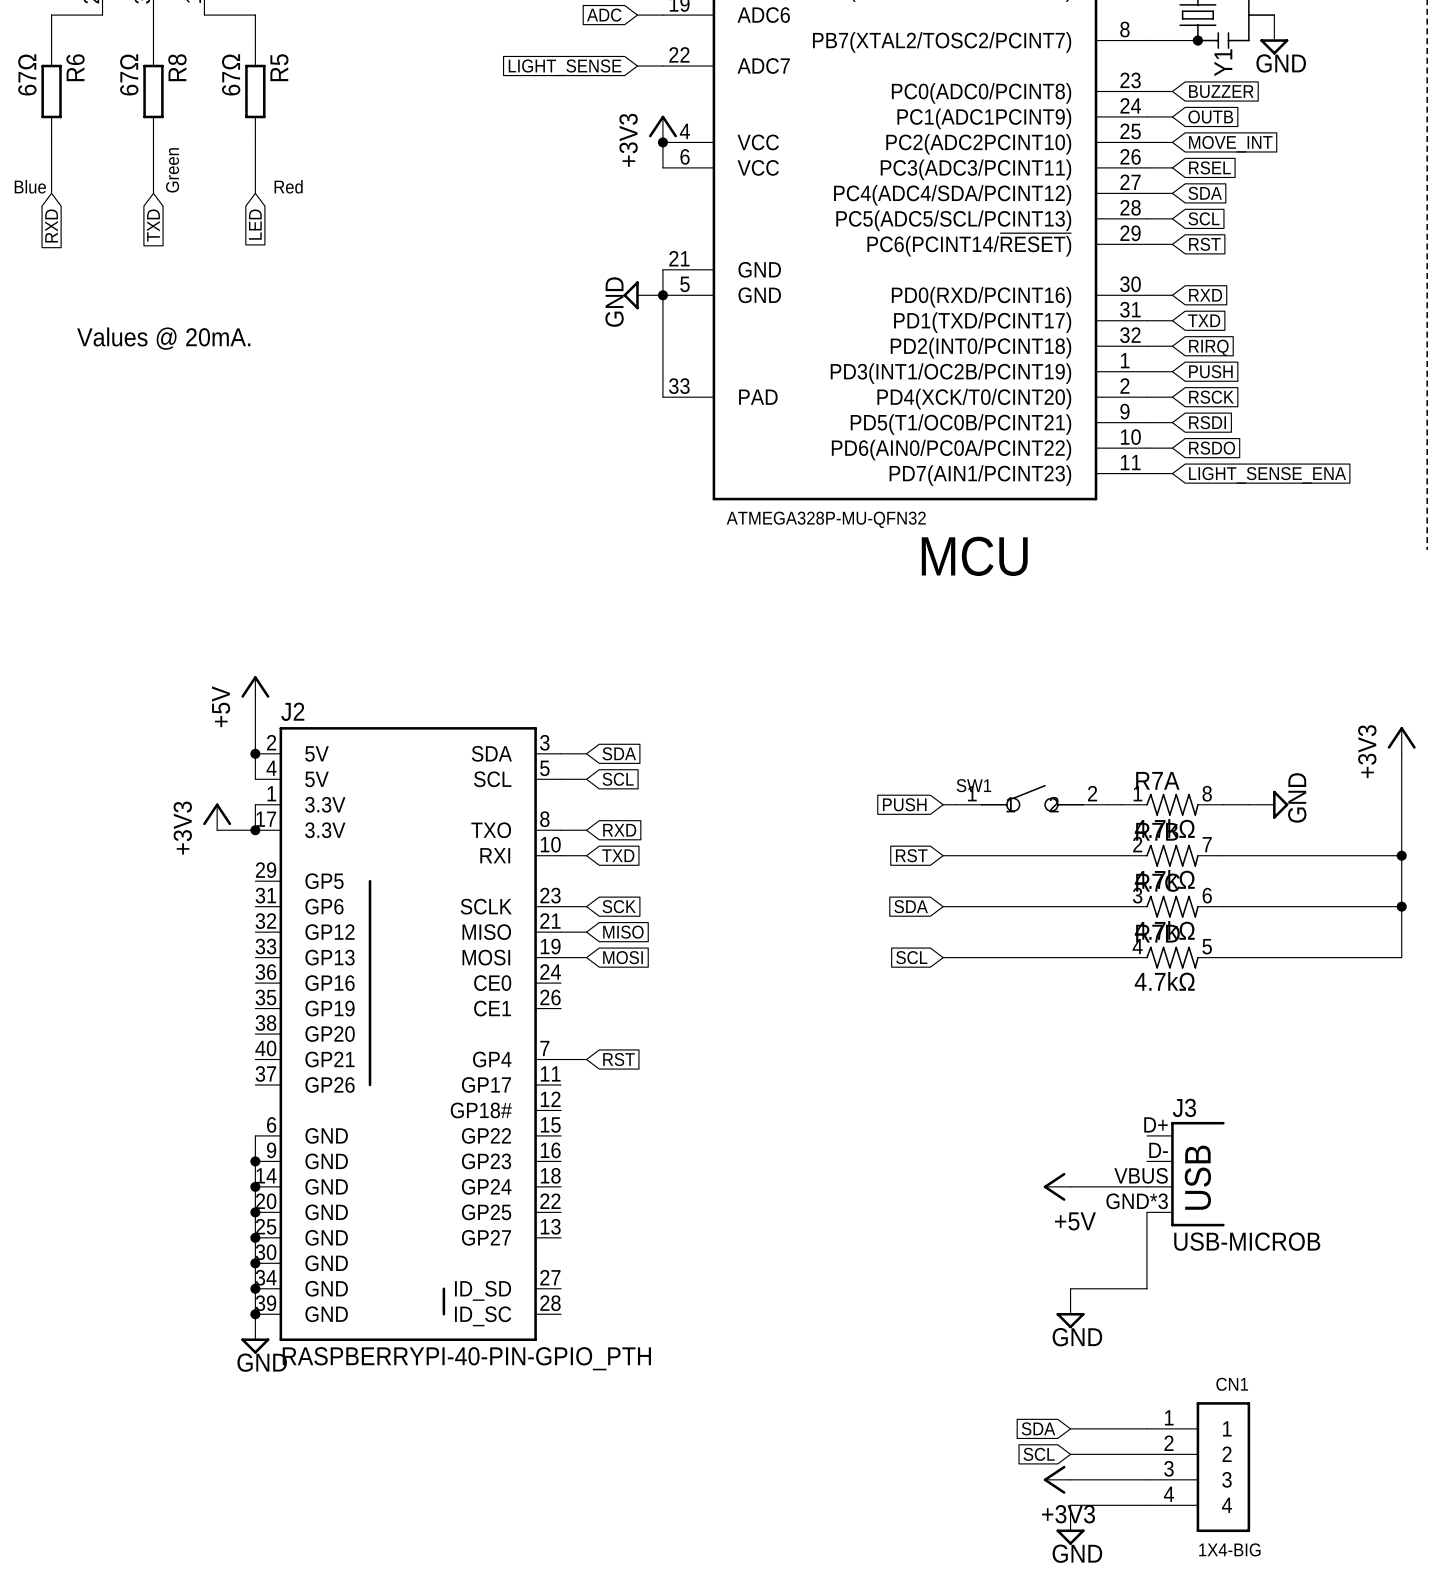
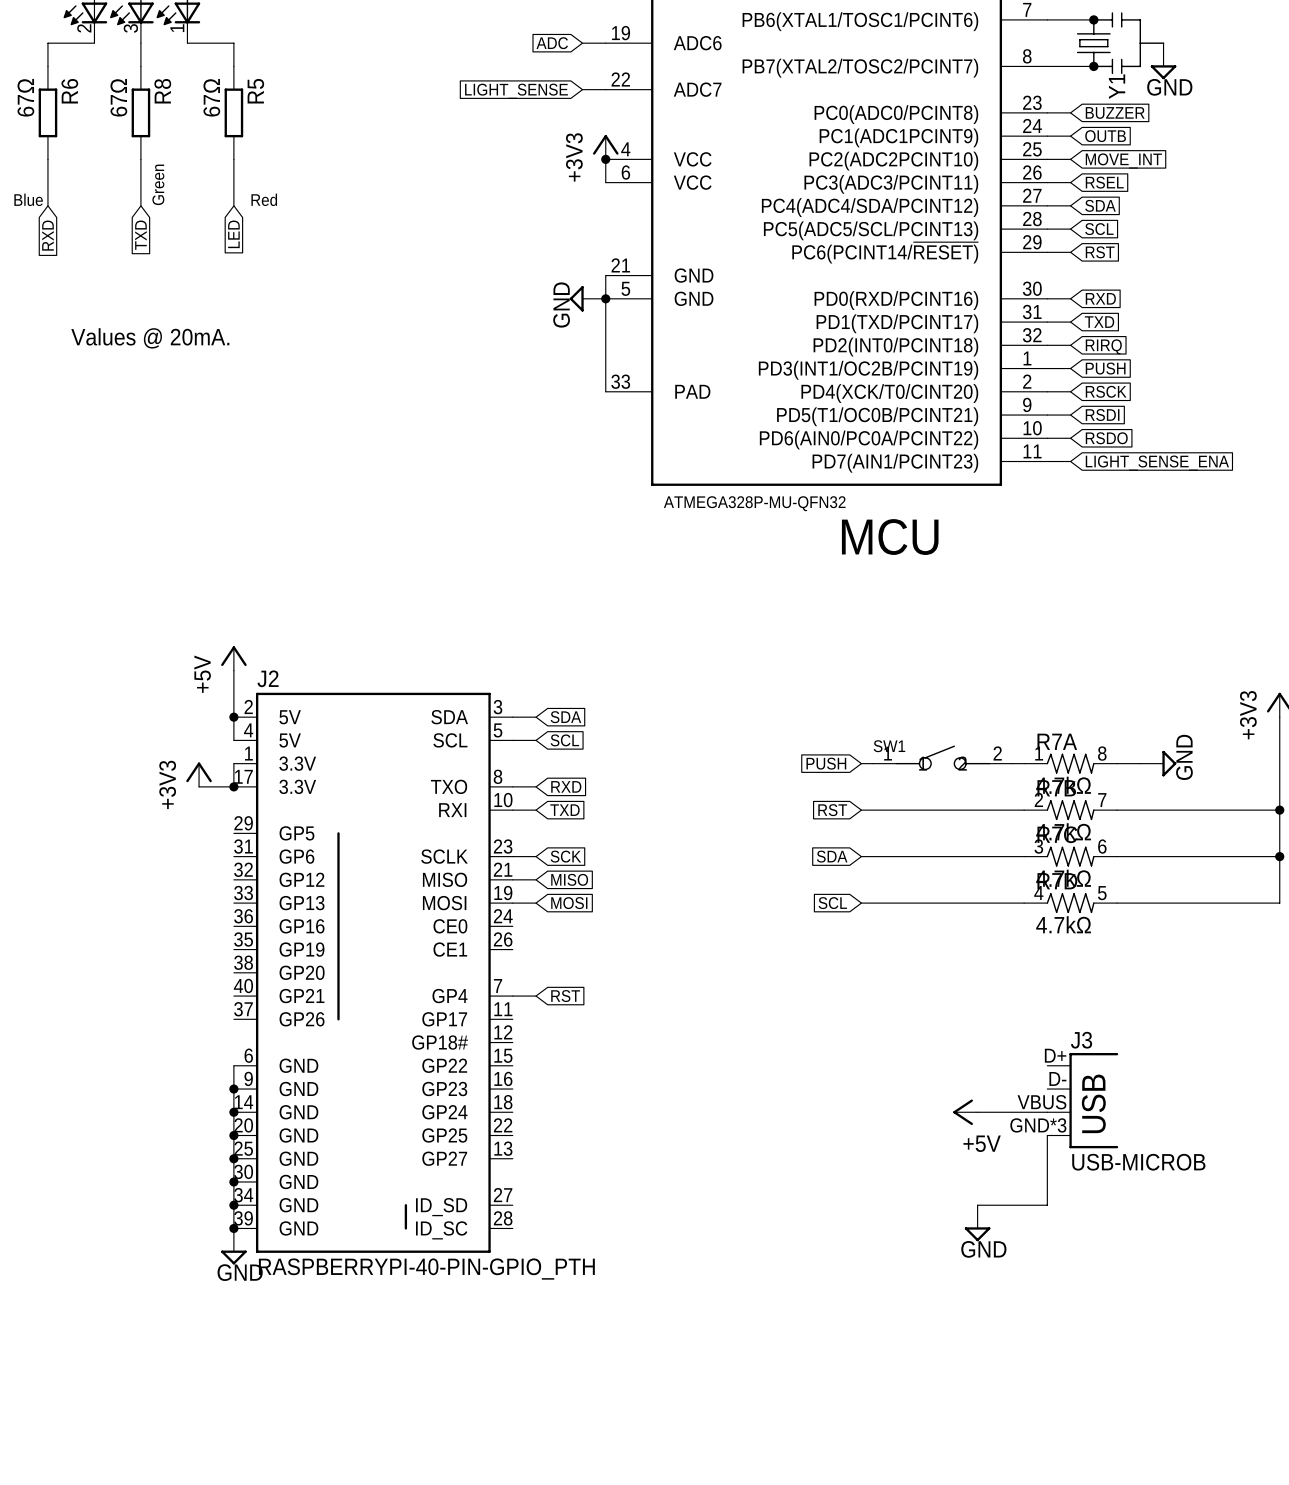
global label: SDA (1038, 1428) -> none
wire: (1070, 1428) (1146, 1428) -> none
global label: SCL (1039, 1454) -> none
wire: (1070, 1454) (1146, 1454) -> none
CN1: 1X4-BIG (1198, 1467) -> none
power symbol: +3V3 (1057, 1479) -> none
wire: (1070, 1479) (1146, 1479) -> none
wire: (1070, 1505) (1146, 1505) -> none
power symbol: GND (1070, 1525) -> none

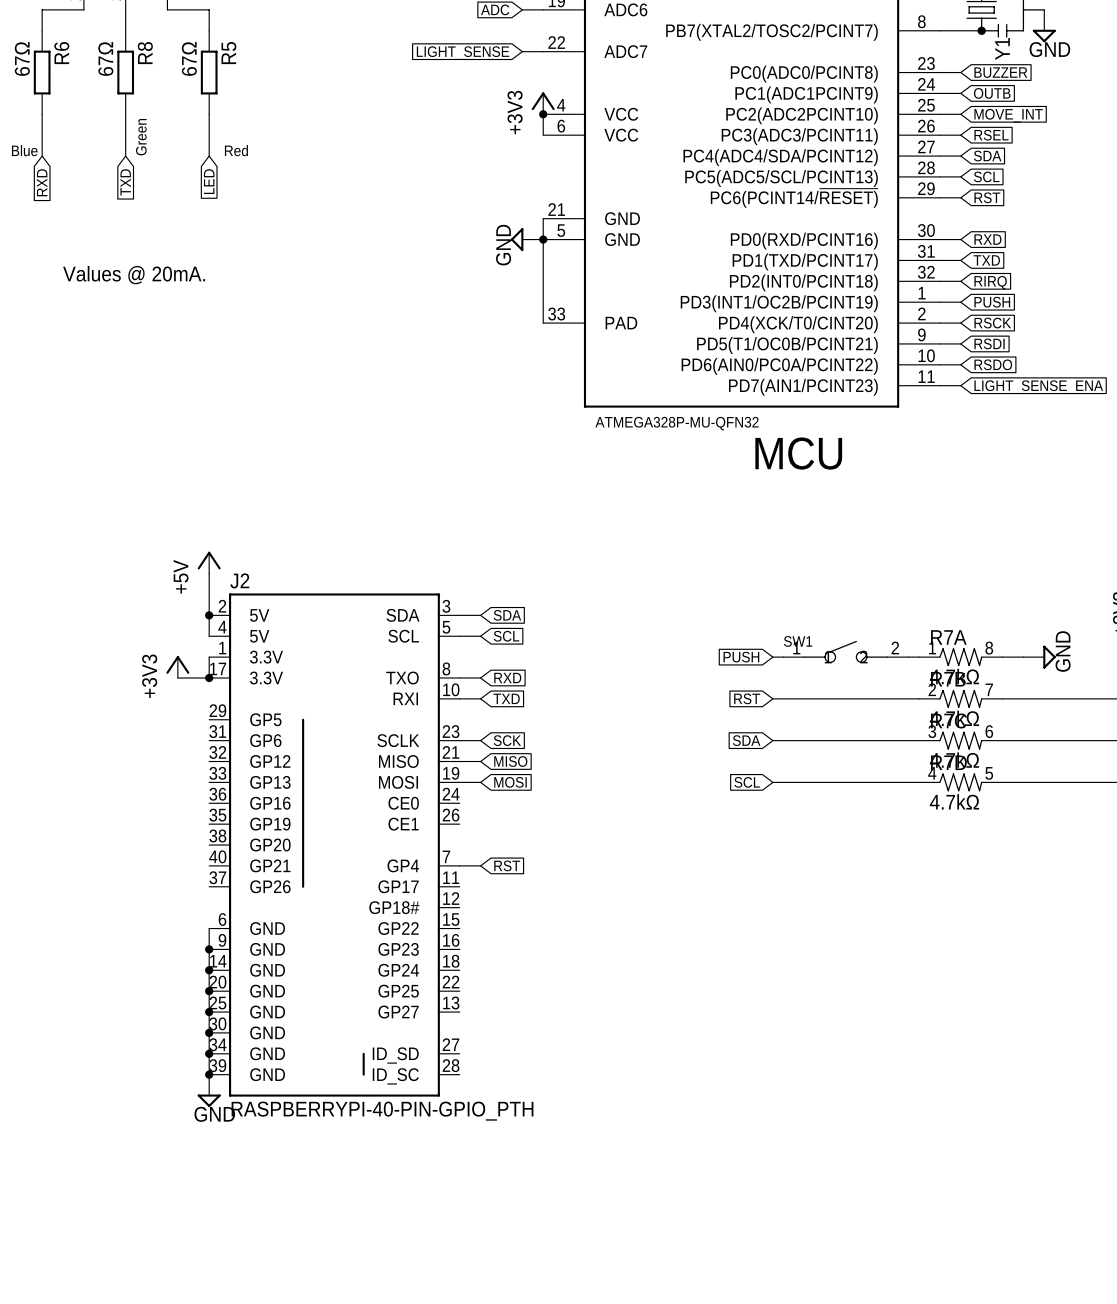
J3: USB-MICROB (1082, 1100) -> none
power symbol: +5V (965, 1112) -> none
wire: (977, 1112) (1047, 1112) -> none
wire: (1047, 1135) (1047, 1205) (977, 1205) -> none
power symbol: GND (977, 1223) -> none

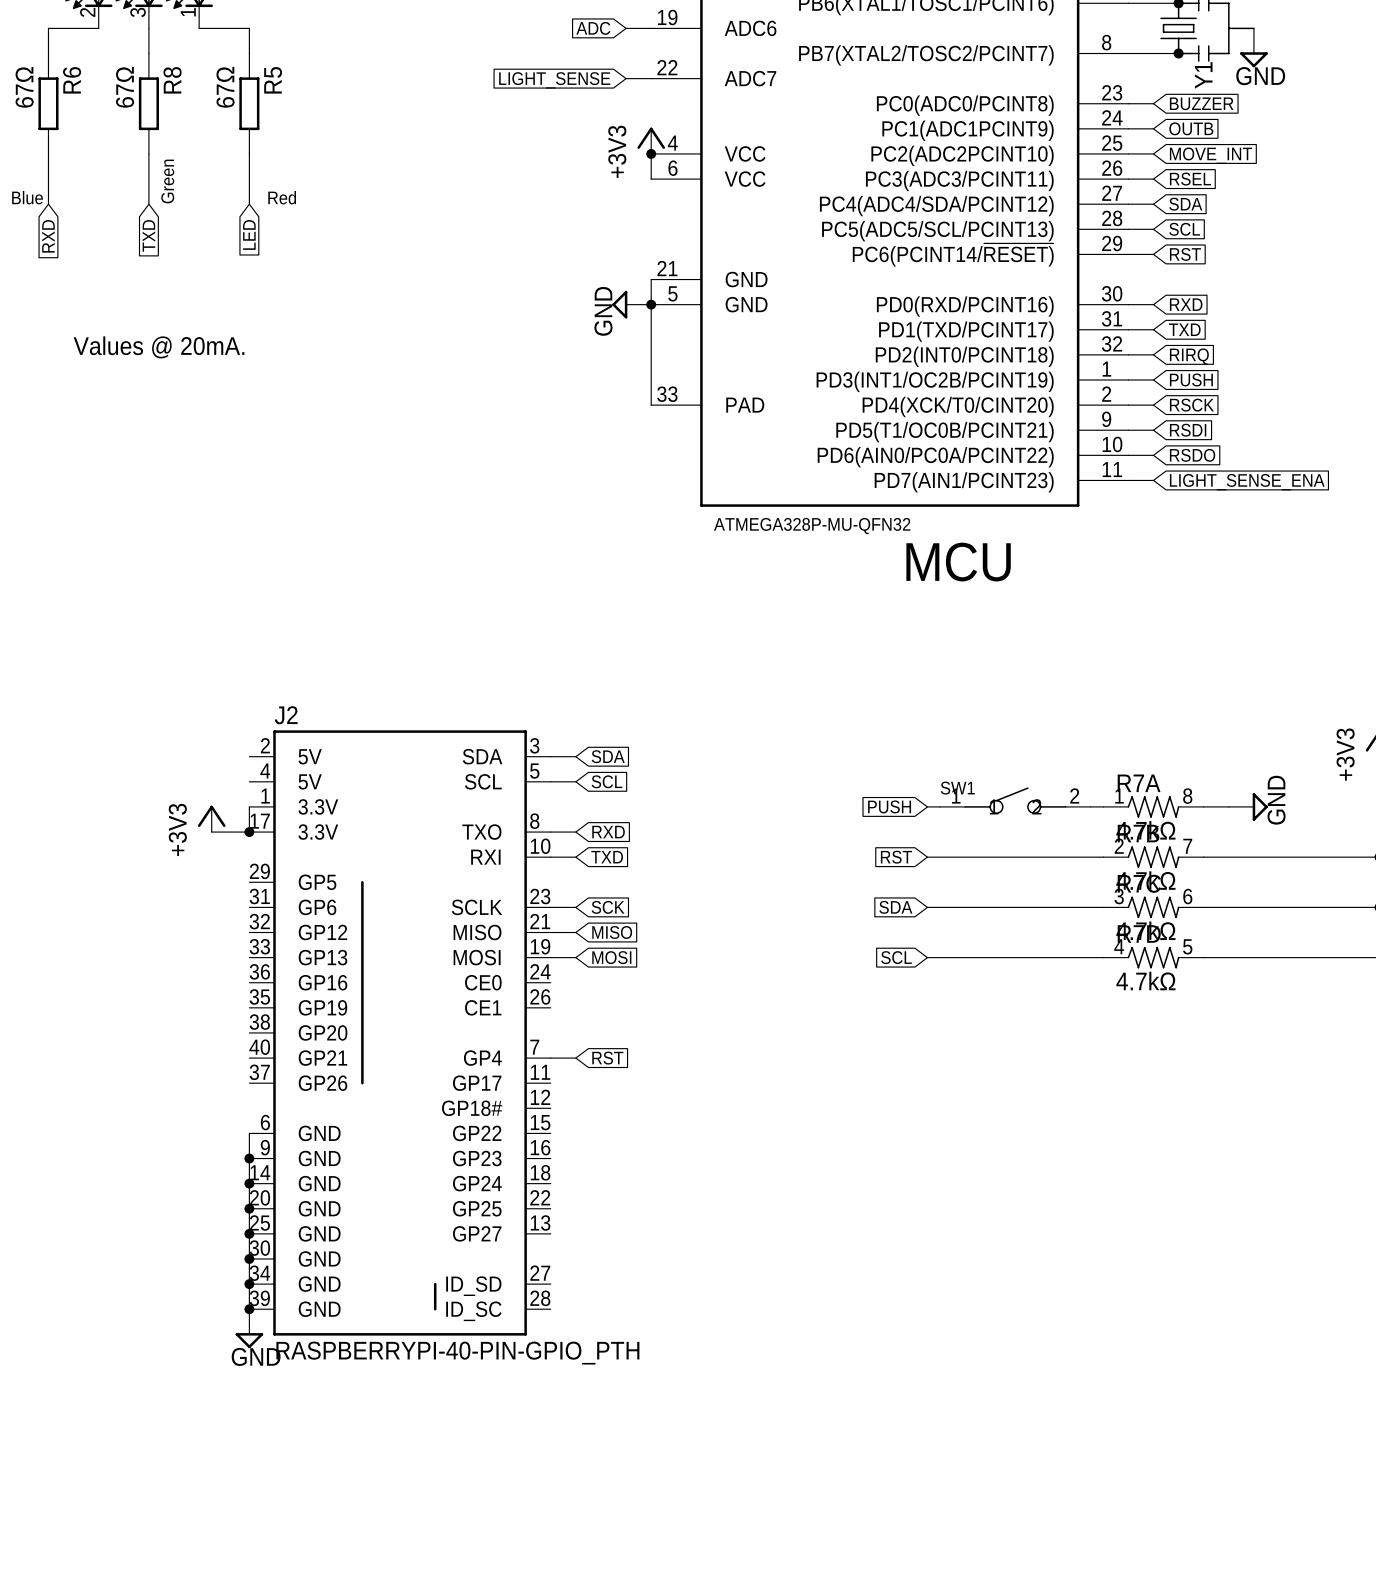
power symbol: +5V (209, 562) -> none
wire: (209, 573) (209, 636) -> none
junction: (209, 615) -> none

